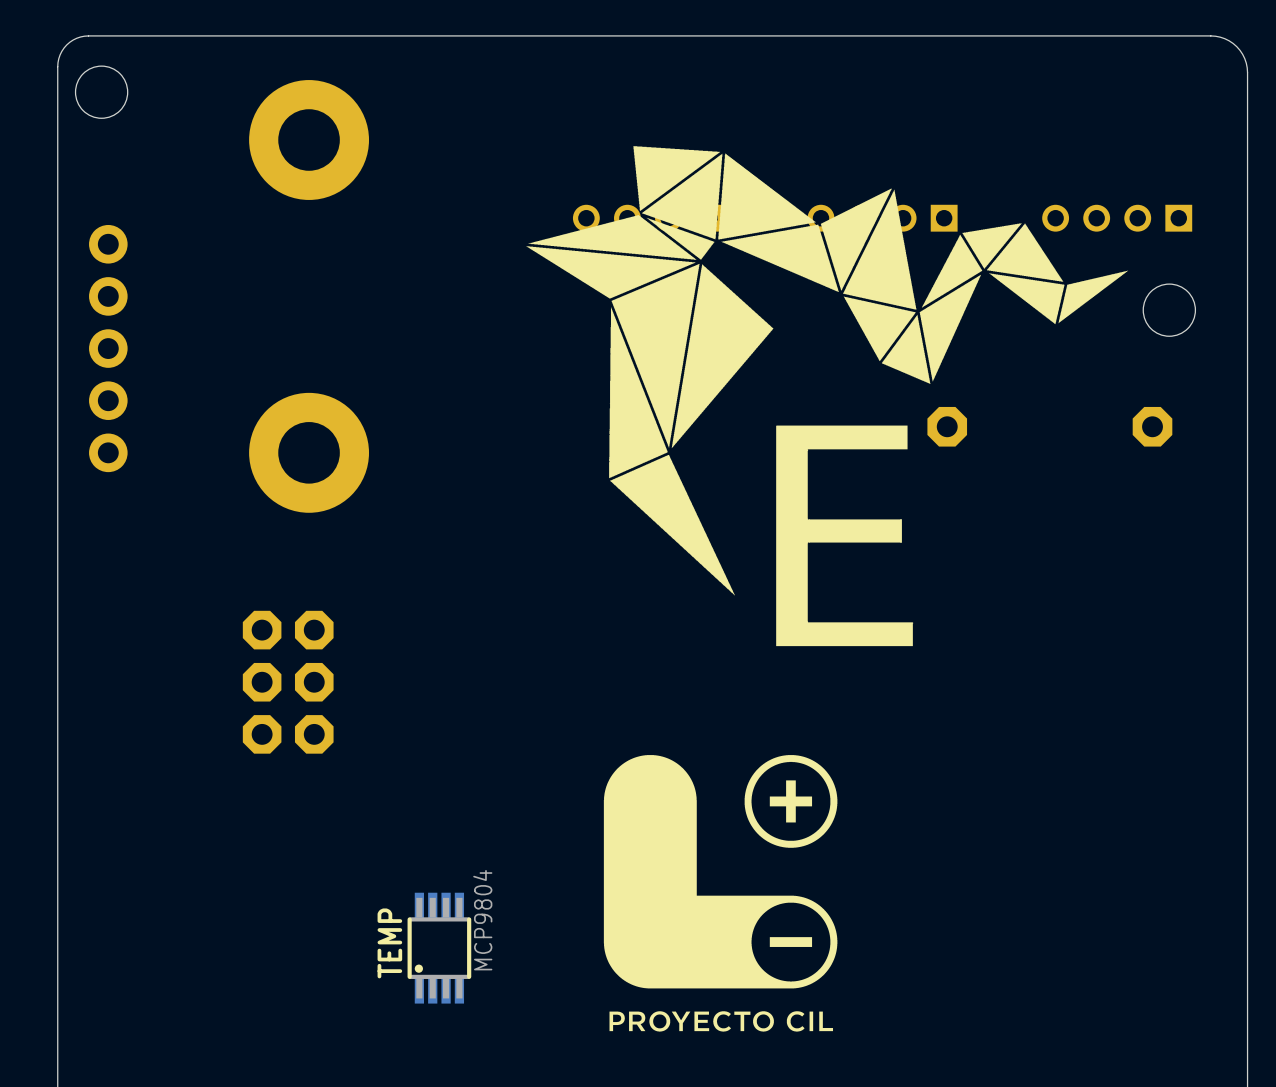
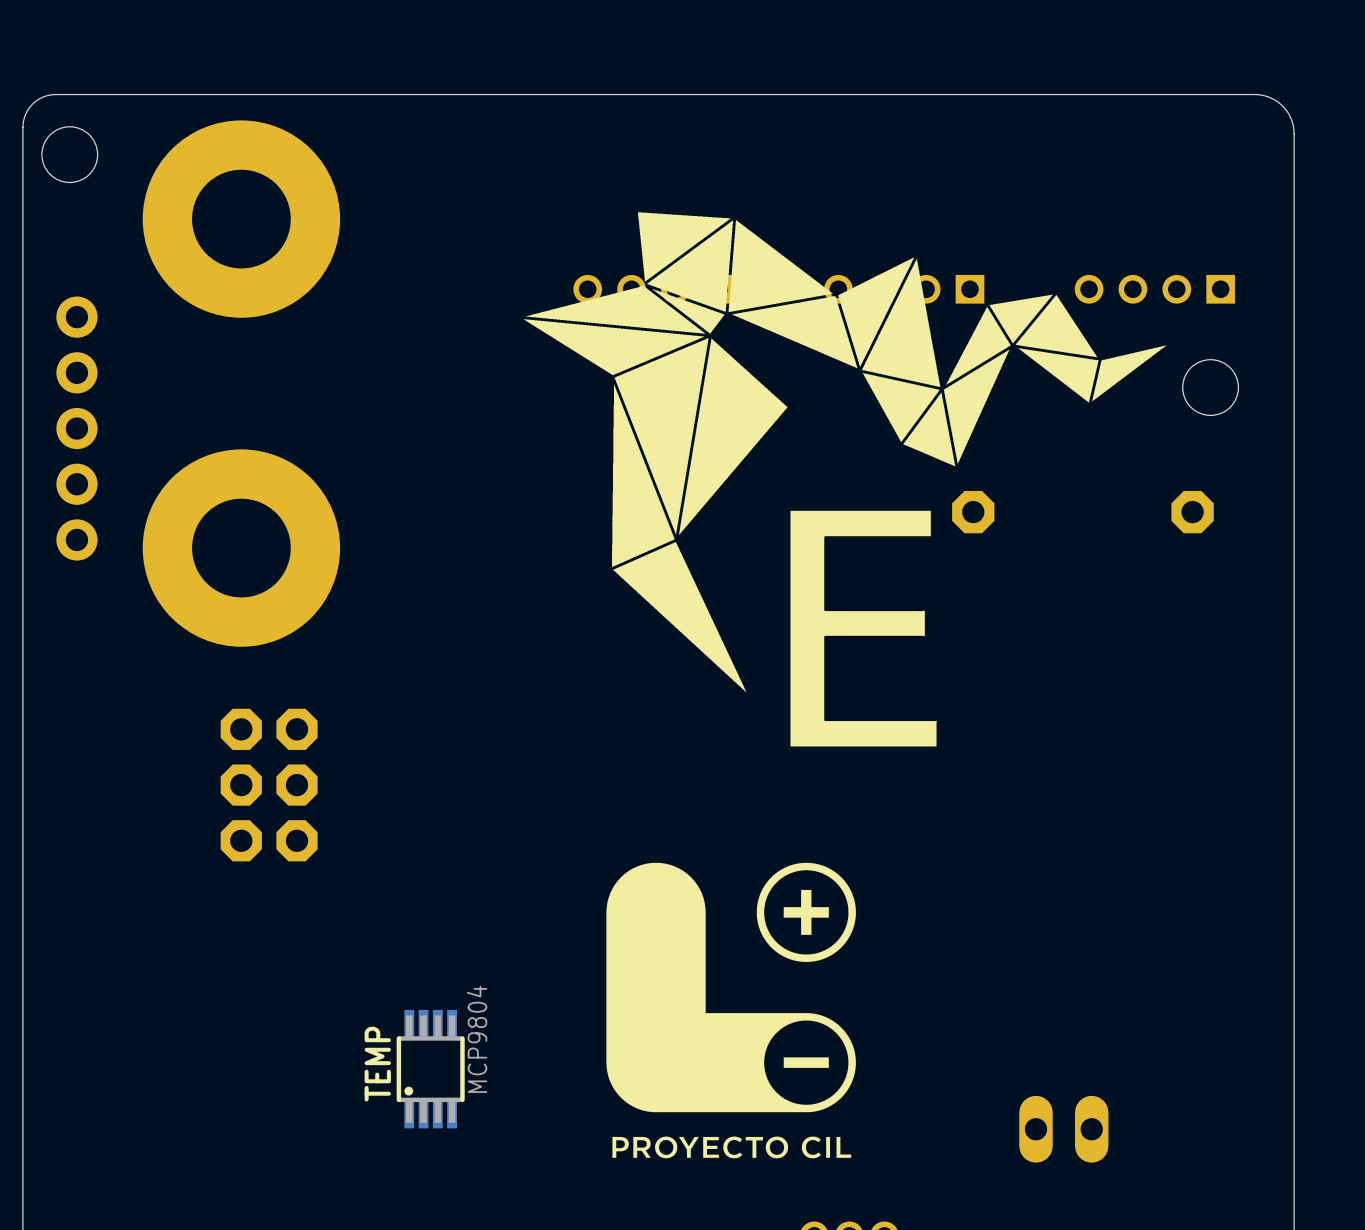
part: (309, 140) -> none
part: none -> (241, 219)
part: (309, 452) -> none
part: none -> (241, 548)
part: none -> (1063, 1129)

